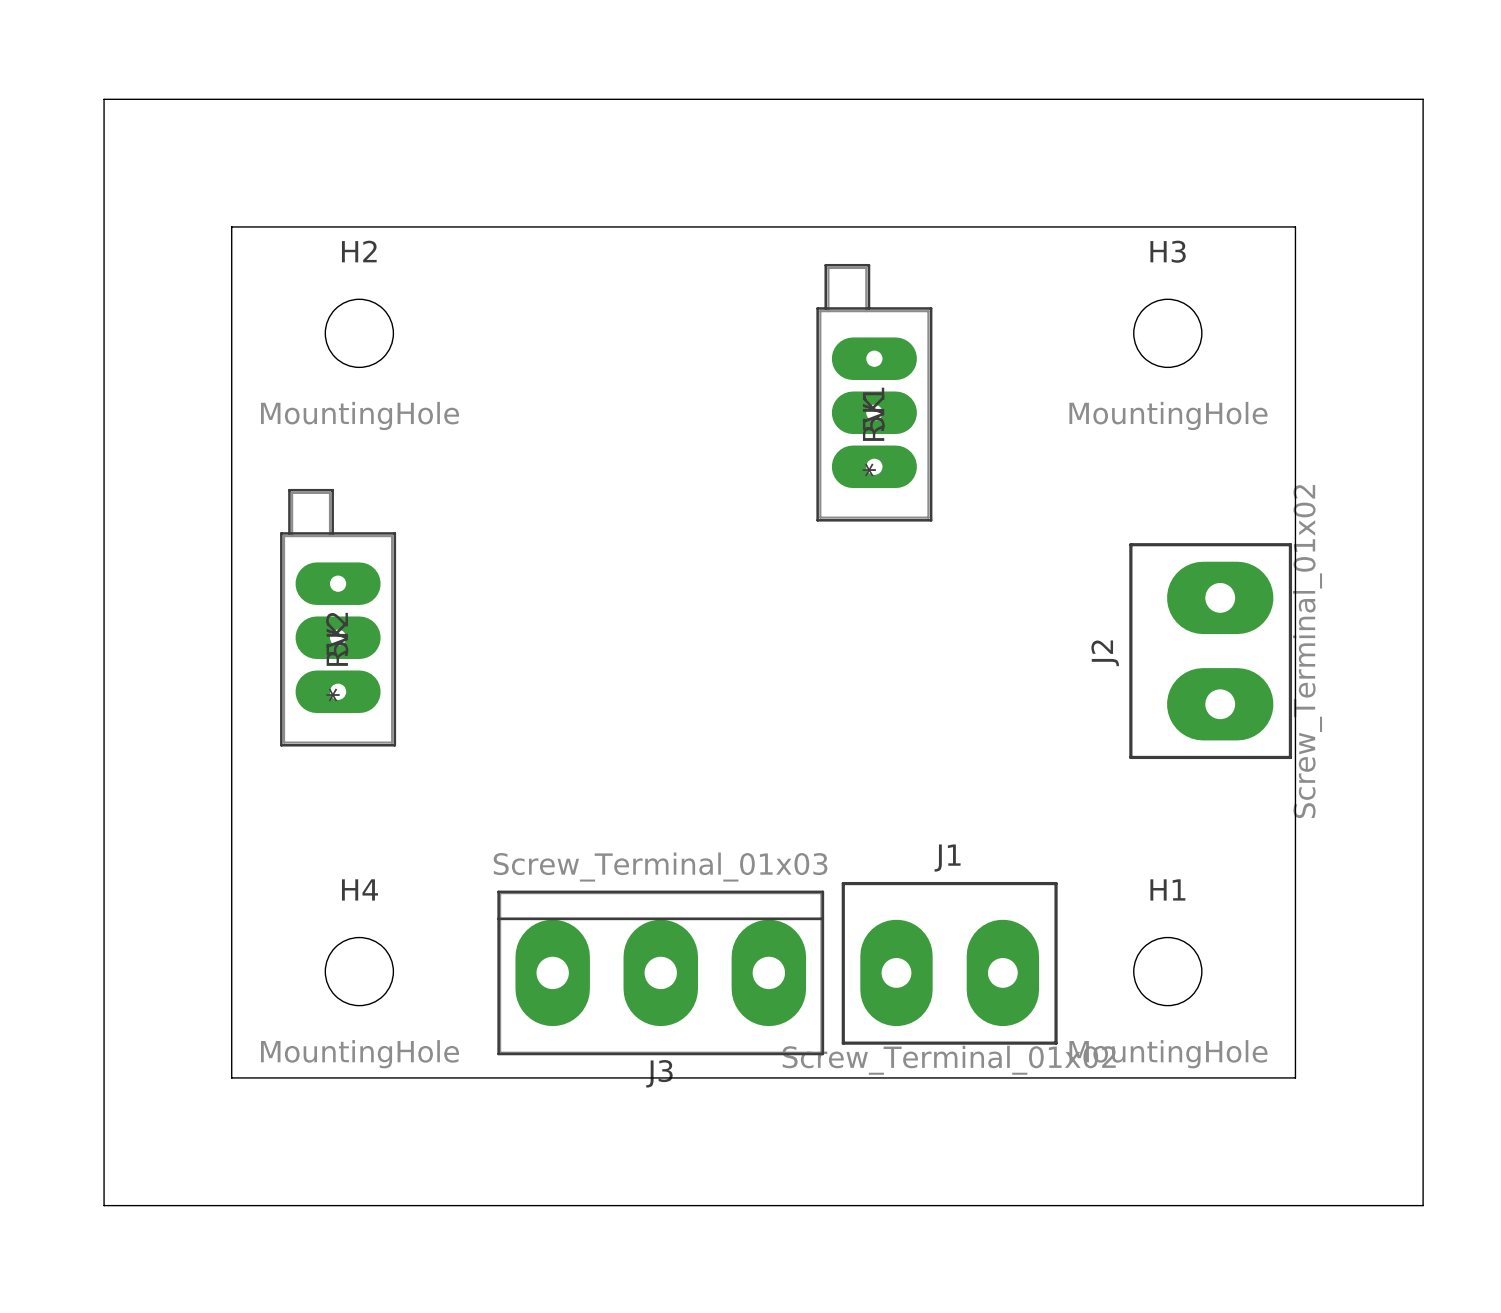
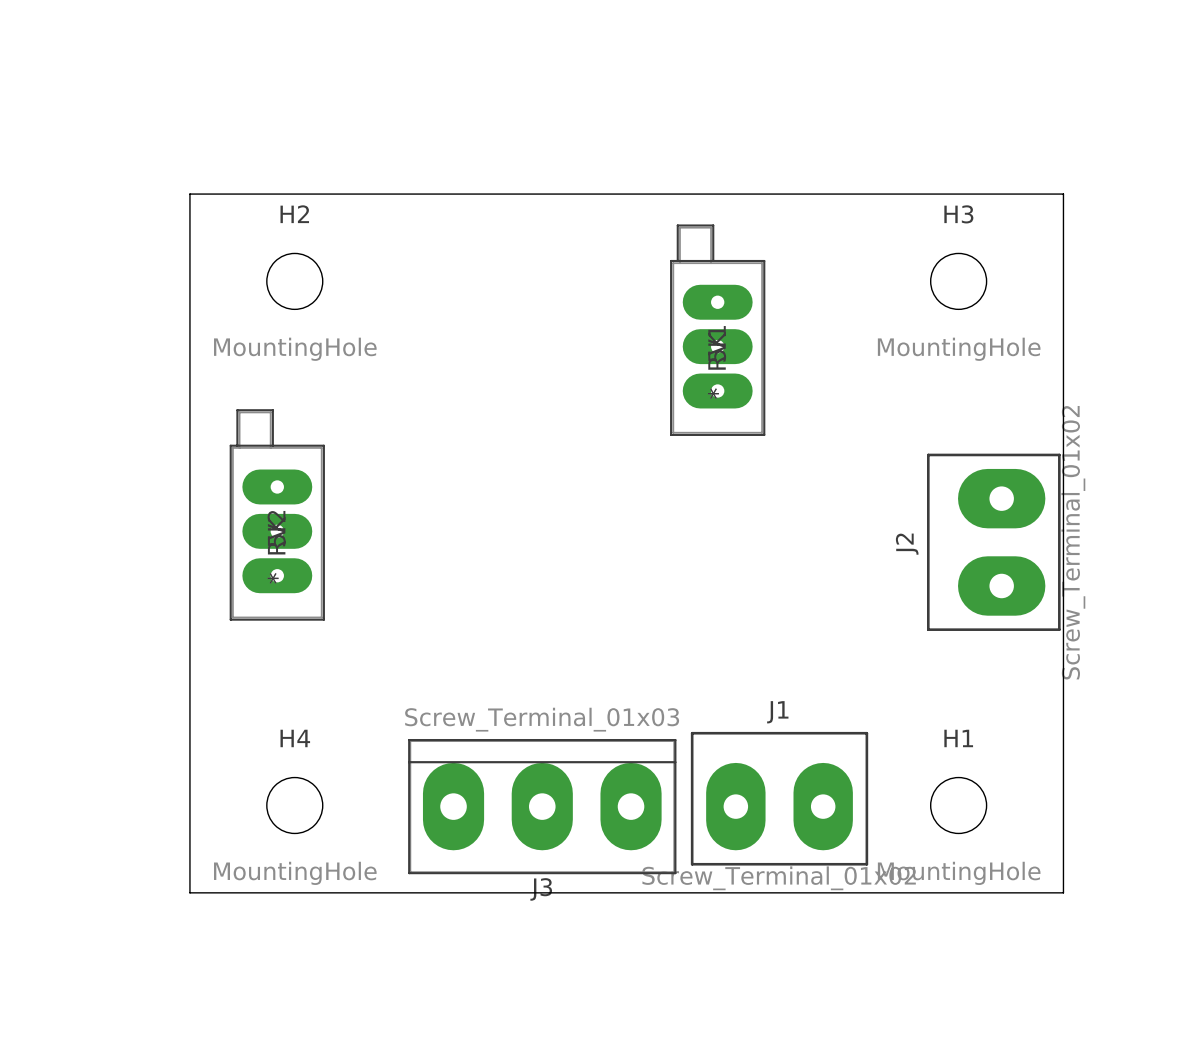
board edge: (104, 99) (104, 1205) (1423, 1205) (1423, 99) (104, 99) -> none

